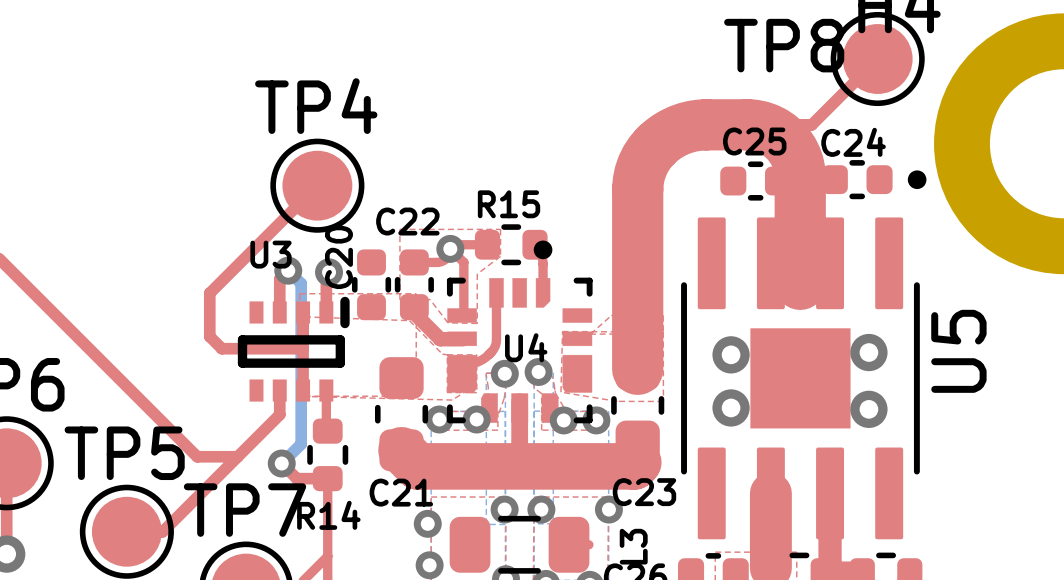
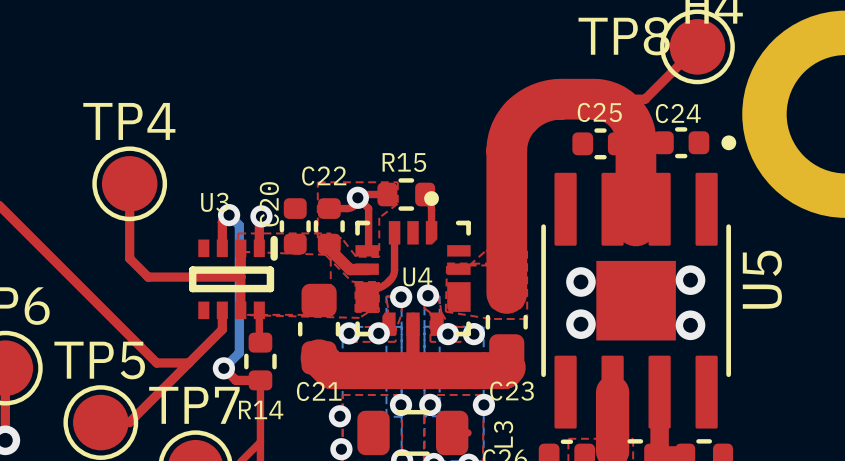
top track: (317, 185) (209, 293) (209, 336) (221, 348) -> (129, 183) (129, 258) (148, 277) (176, 277)
TP4 position: (317, 185) -> (129, 183)

